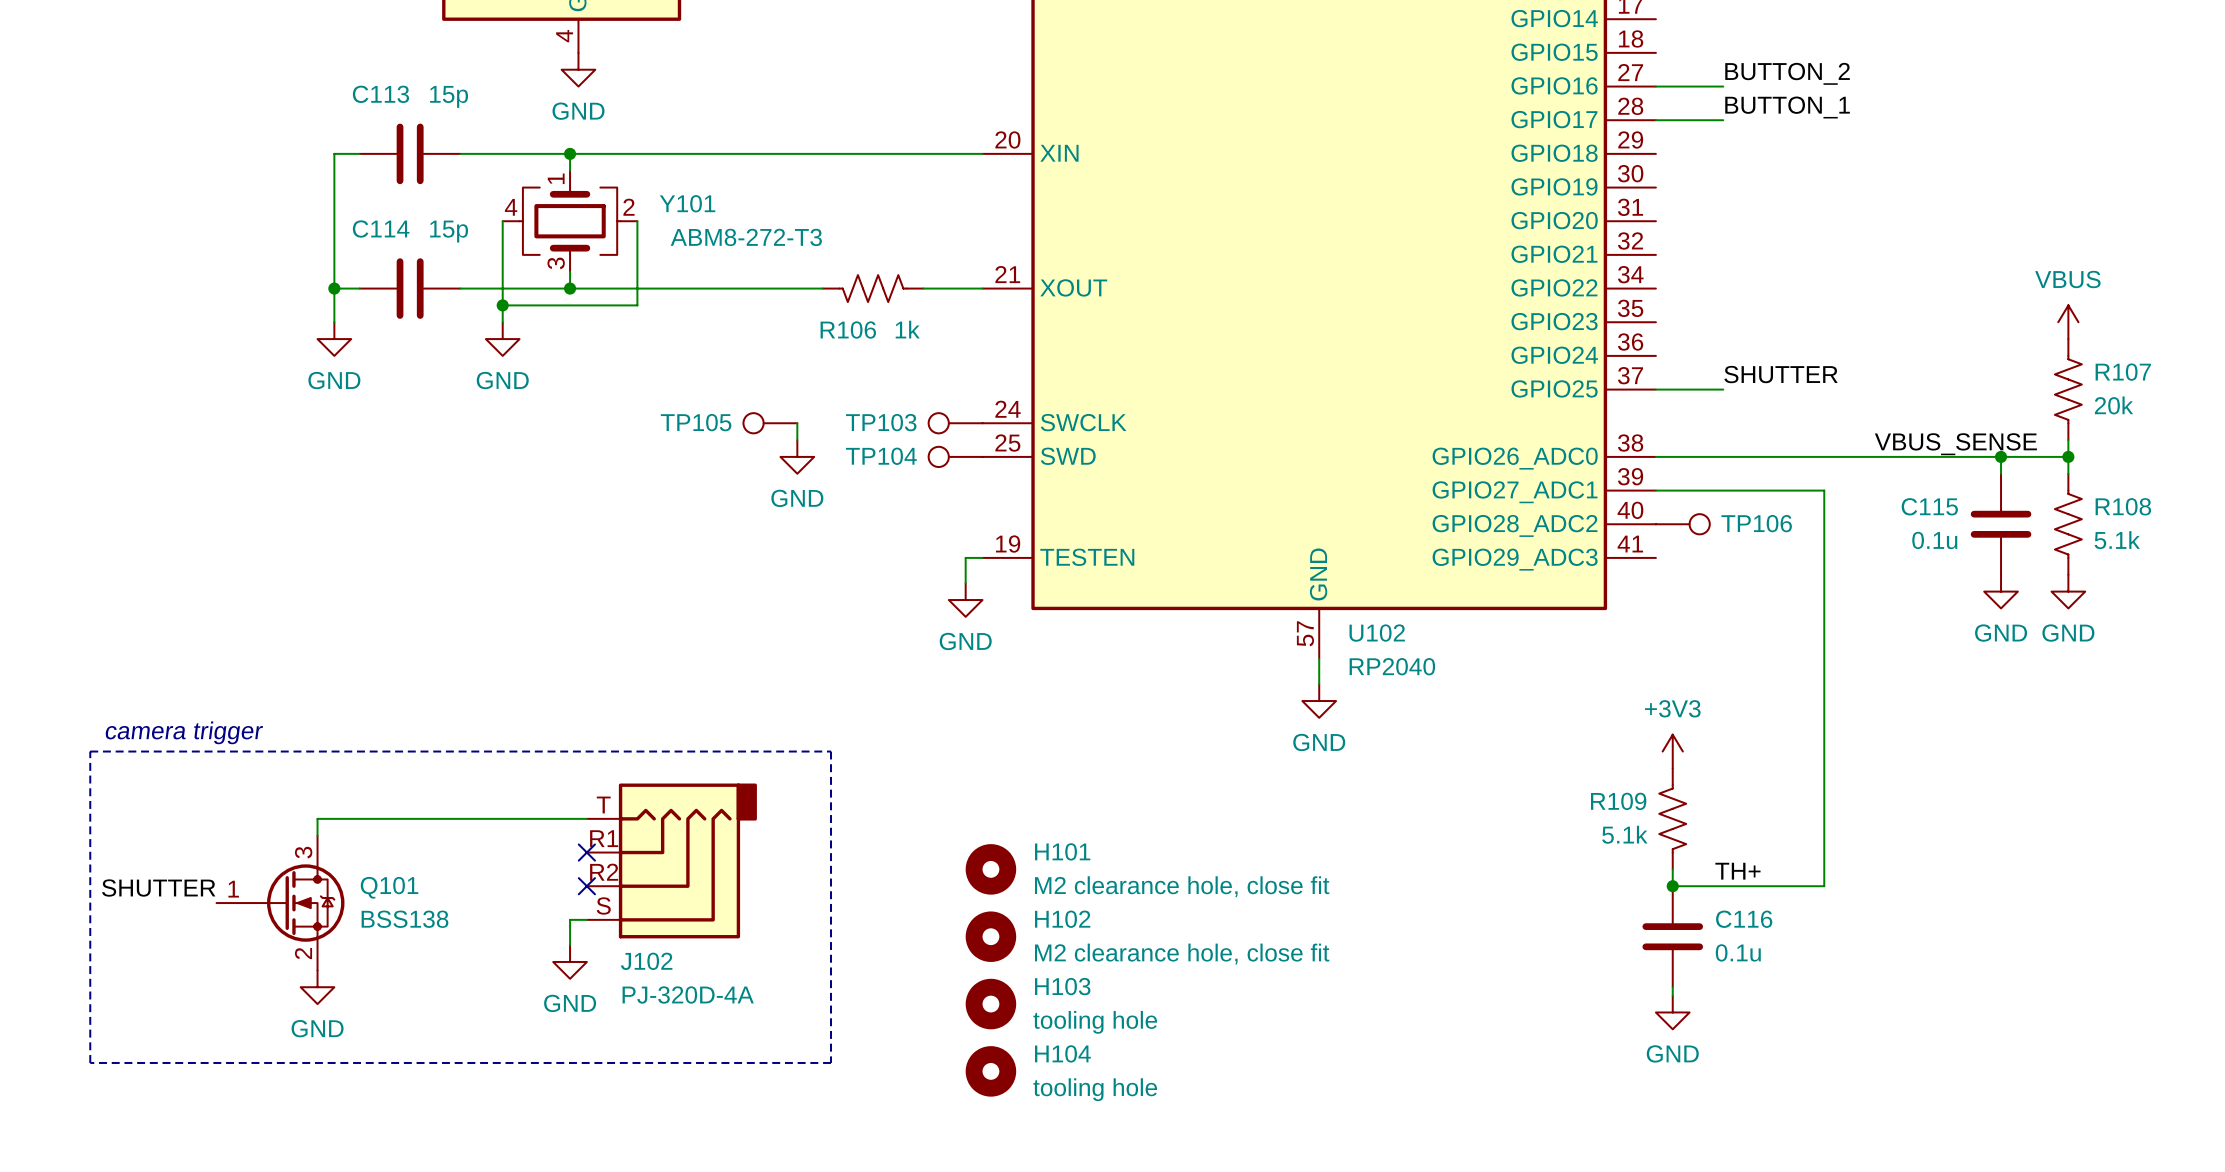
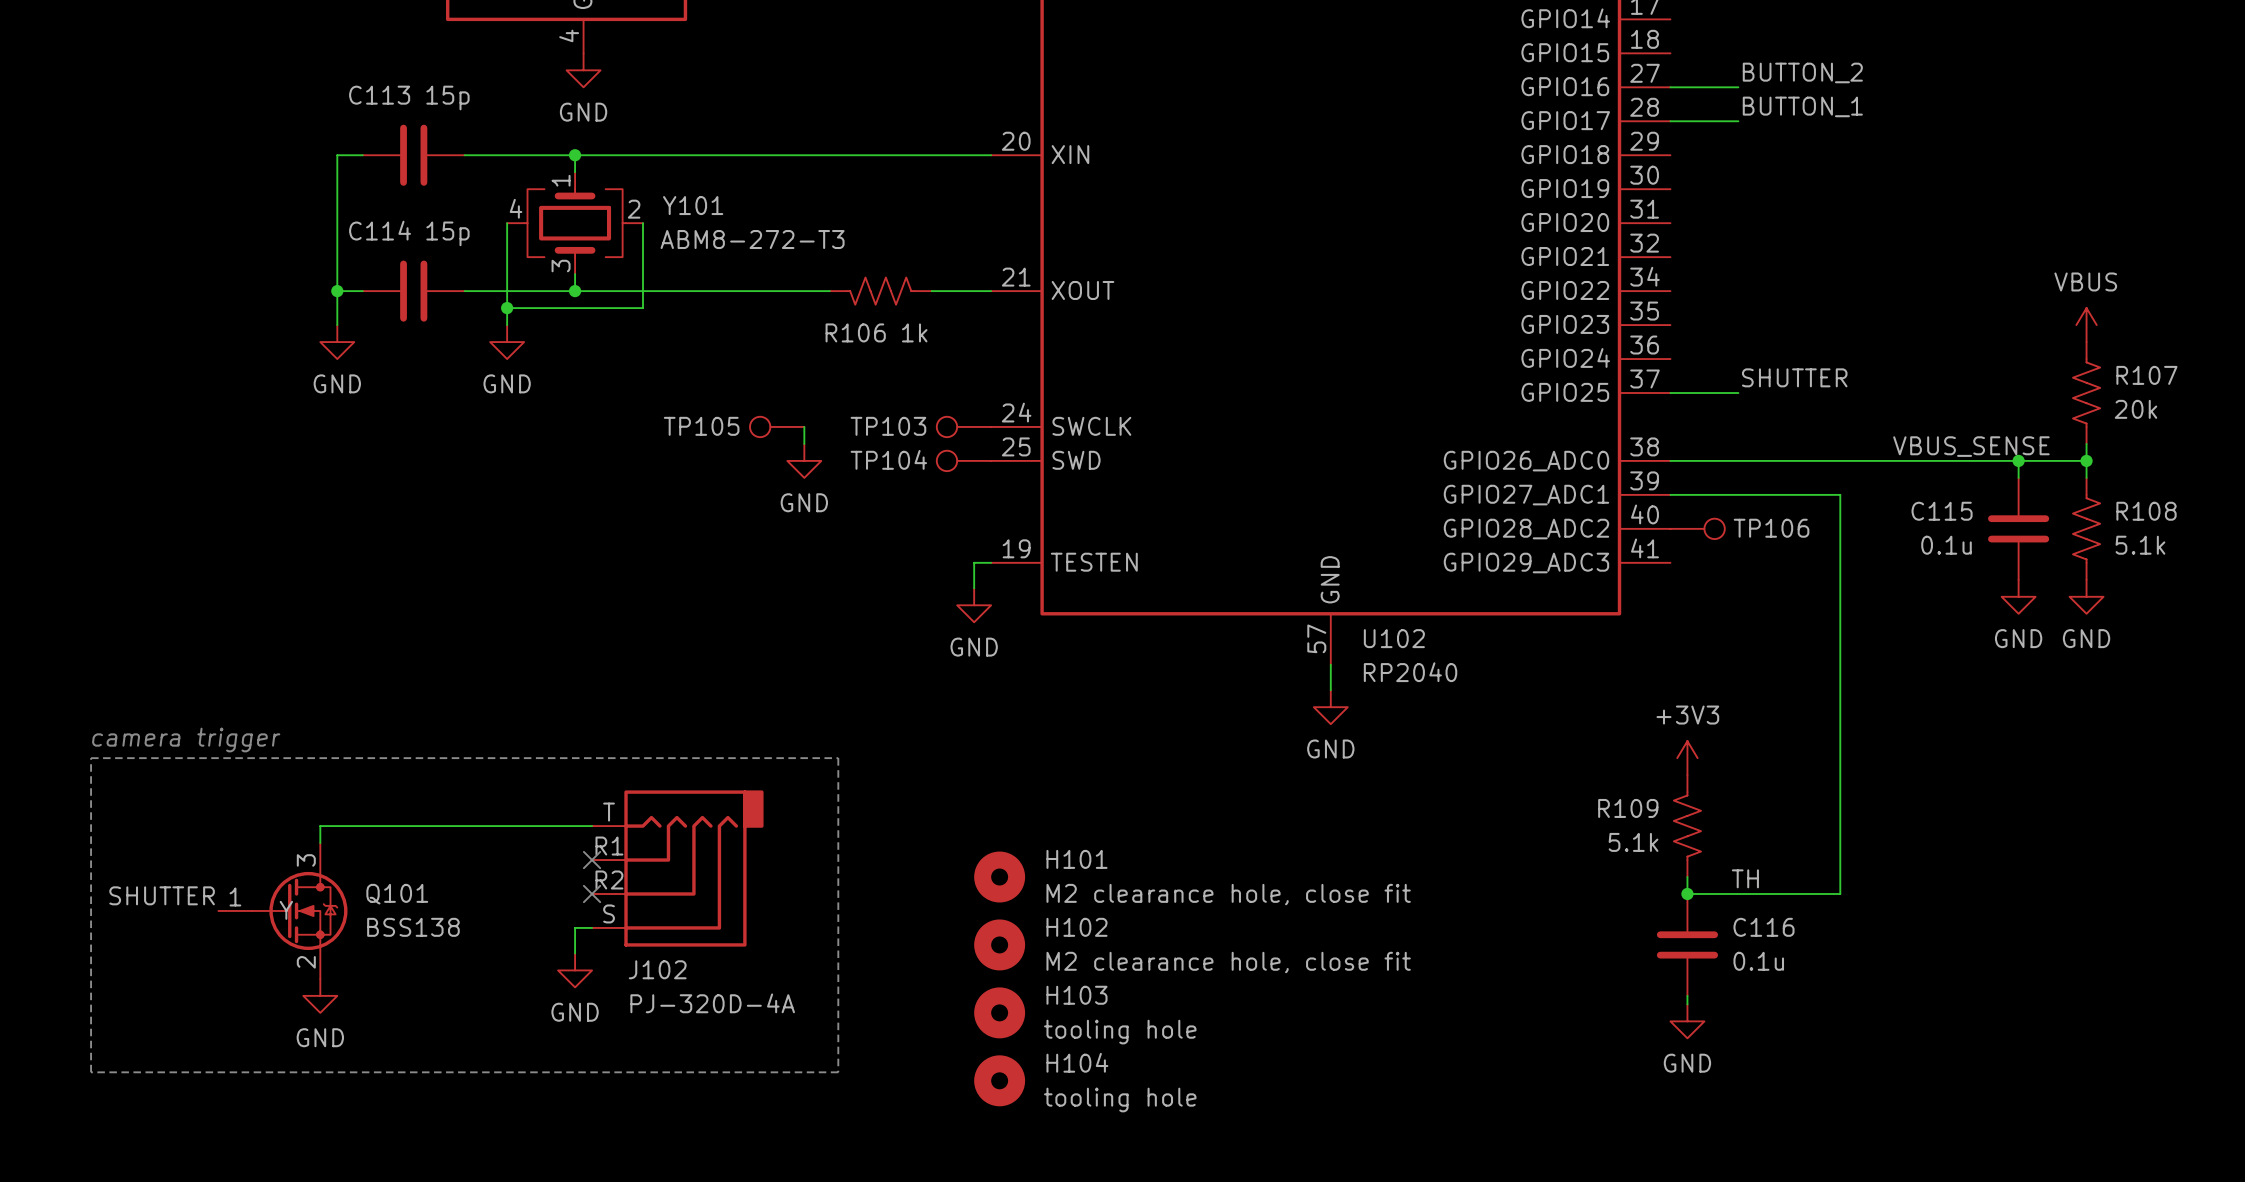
label: TH+ (1737, 871) -> TH (1745, 878)
Q101 text: none -> Y (286, 910)

